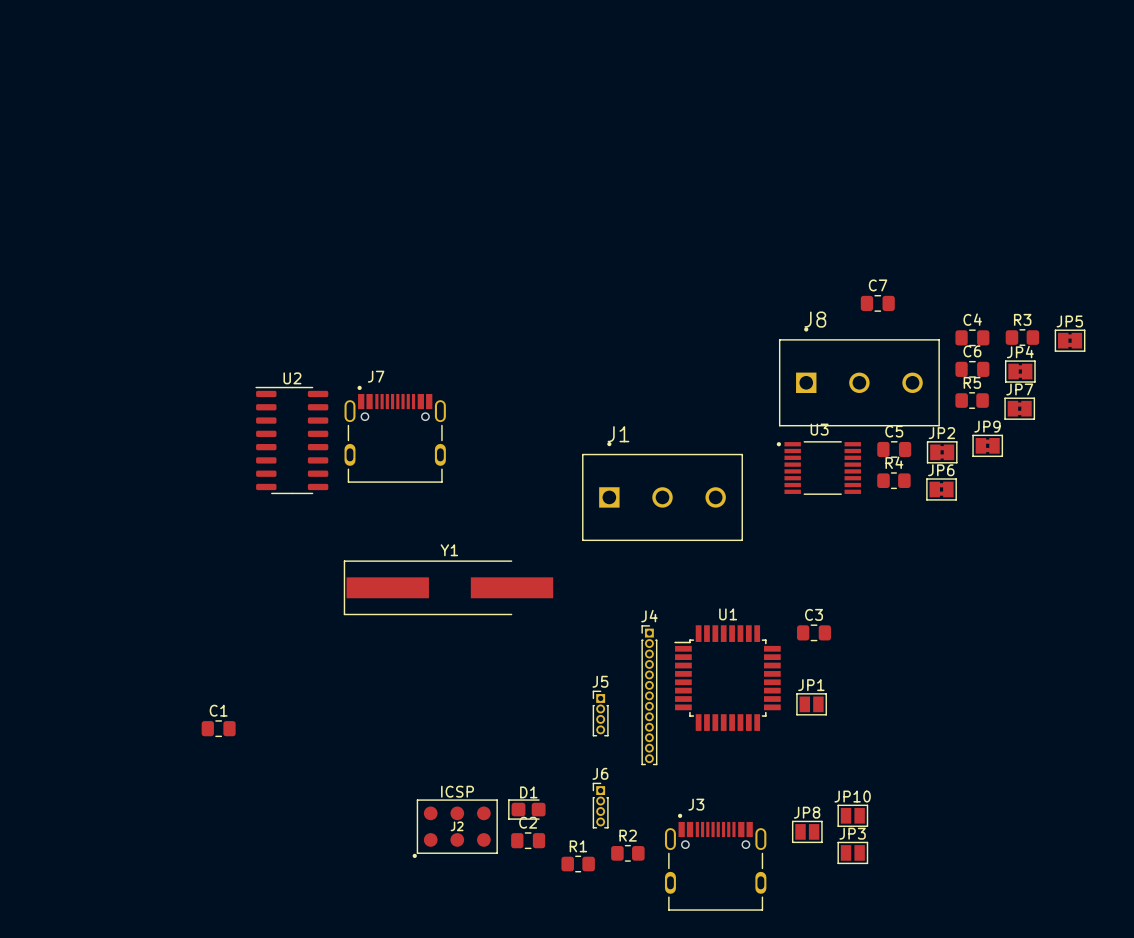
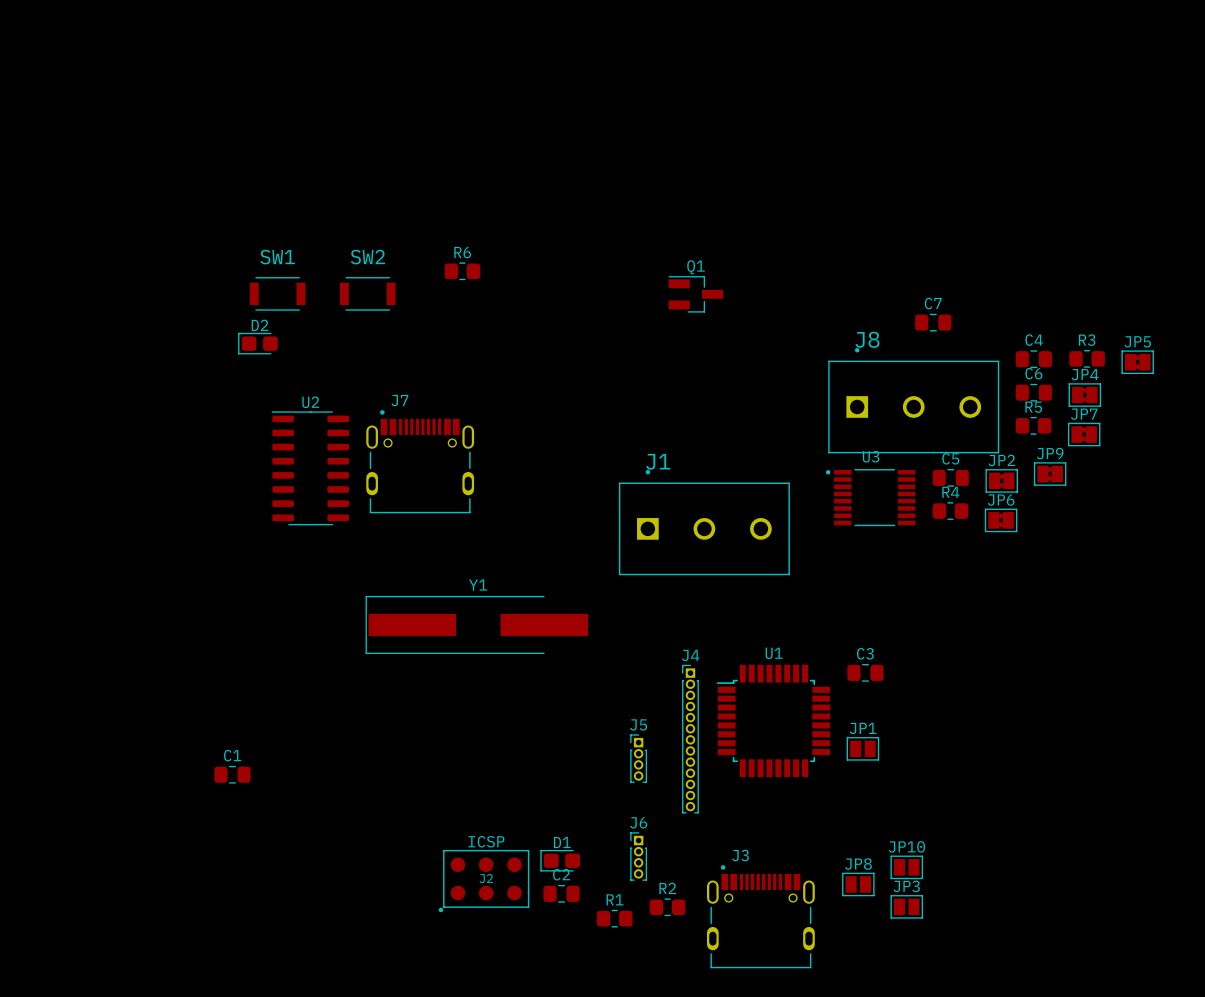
R6: none -> (462, 271)
SW1: none -> (277, 293)
SW2: none -> (367, 293)
Q1: none -> (695, 294)
D2: none -> (257, 343)

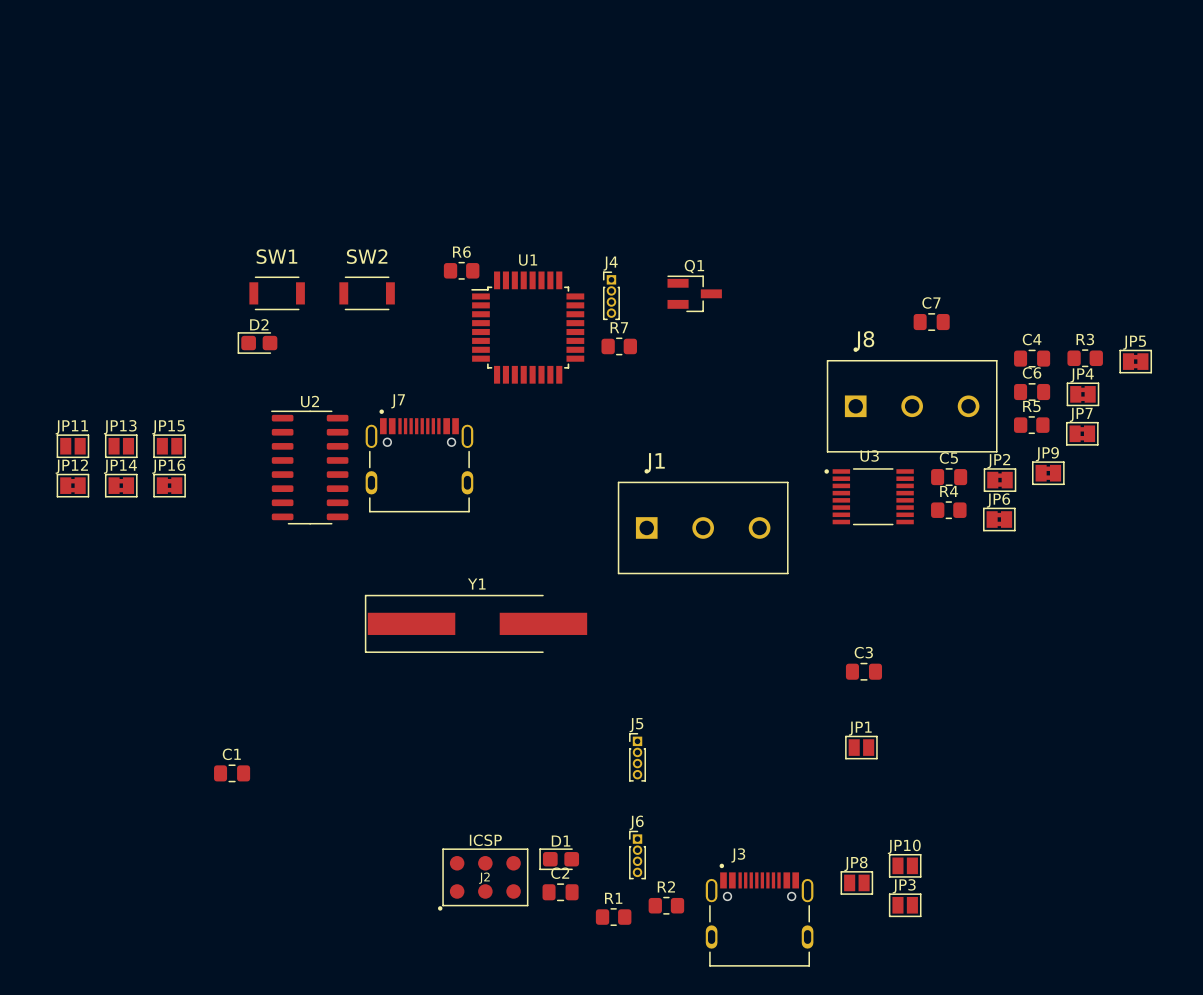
R7: none -> (619, 346)
JP11: none -> (72, 446)
JP13: none -> (121, 446)
JP15: none -> (169, 446)
JP12: none -> (72, 485)
JP14: none -> (121, 485)
JP16: none -> (169, 485)
J4 name position: J4 (690, 655) -> J4 (610, 263)
J4 footprint: [682, 664, 699, 814] -> [603, 271, 620, 321]
U1 position: (773, 720) -> (527, 327)

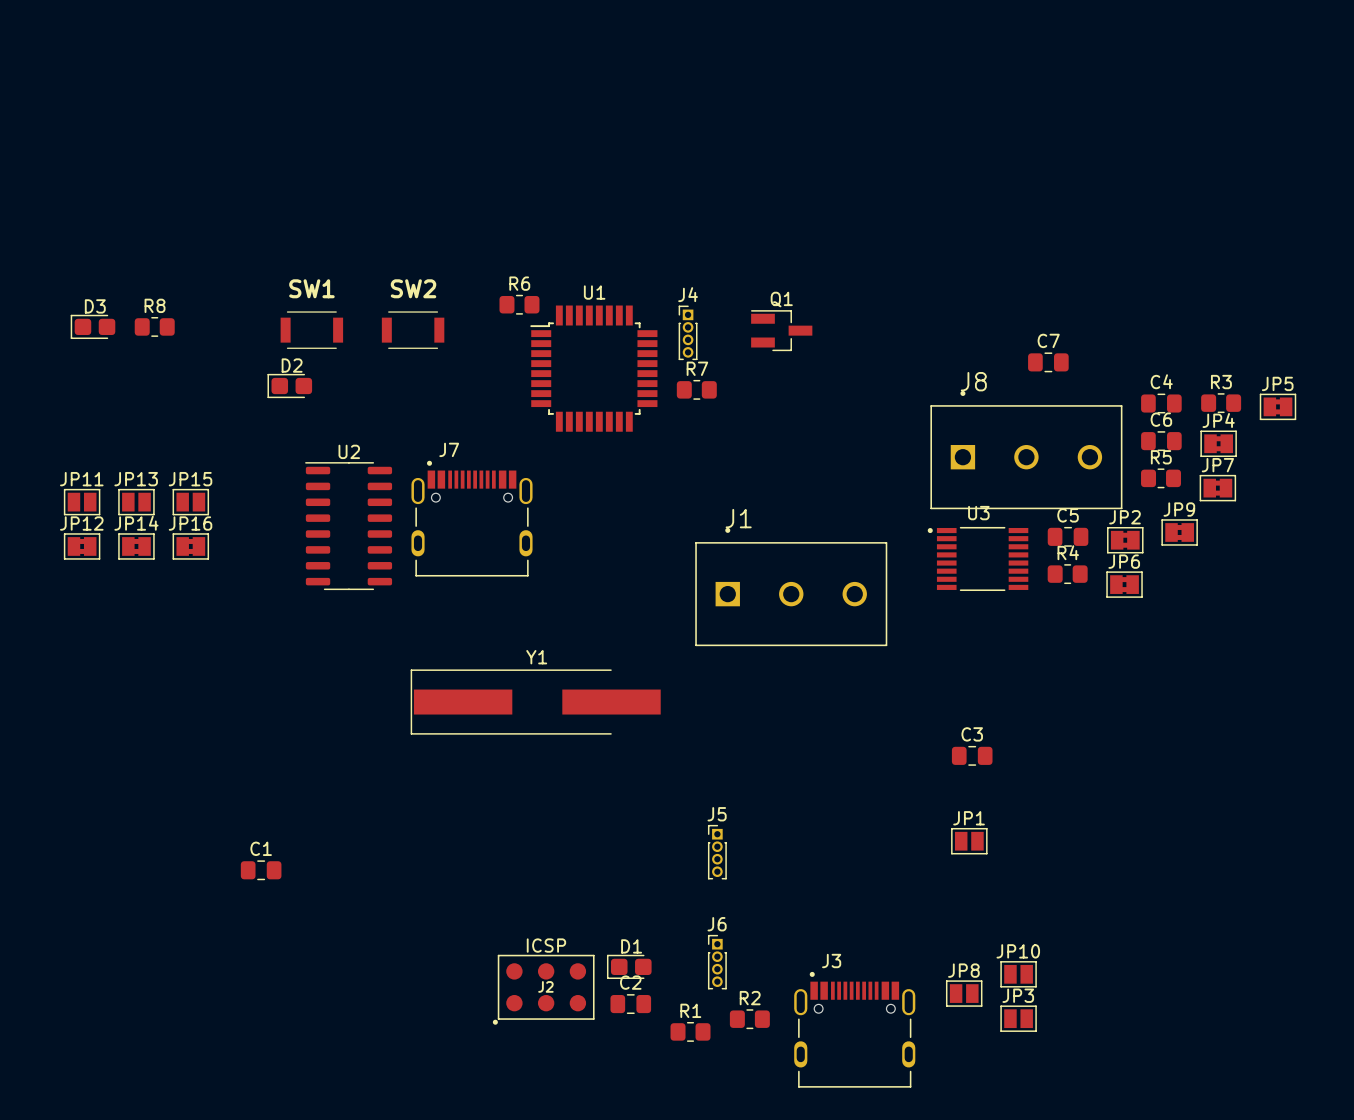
D3: none -> (92, 326)
R8: none -> (154, 326)

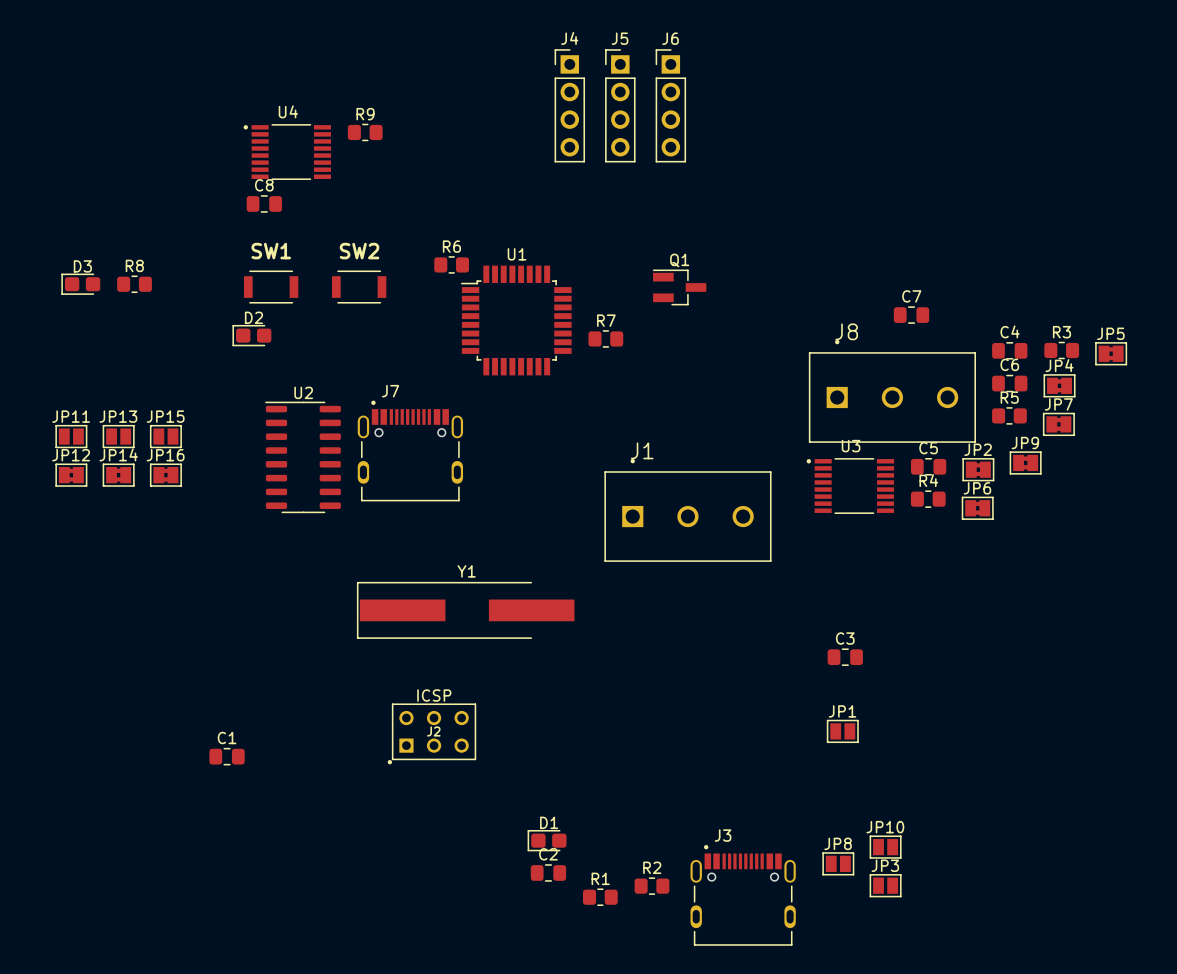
R9: none -> (365, 132)
U4: none -> (287, 152)
C8: none -> (264, 203)
J4 name position: J4 (688, 294) -> J4 (569, 38)
J4 footprint: [678, 305, 698, 361] -> [554, 49, 585, 163]
J5 name position: J5 (717, 814) -> J5 (620, 38)
J5 footprint: [707, 824, 727, 880] -> [605, 49, 636, 163]
J6 name position: J6 (717, 924) -> J6 (670, 38)
J6 footprint: [707, 934, 727, 990] -> [655, 49, 686, 163]
J2 footprint: [492, 954, 595, 1025] -> [387, 703, 477, 765]

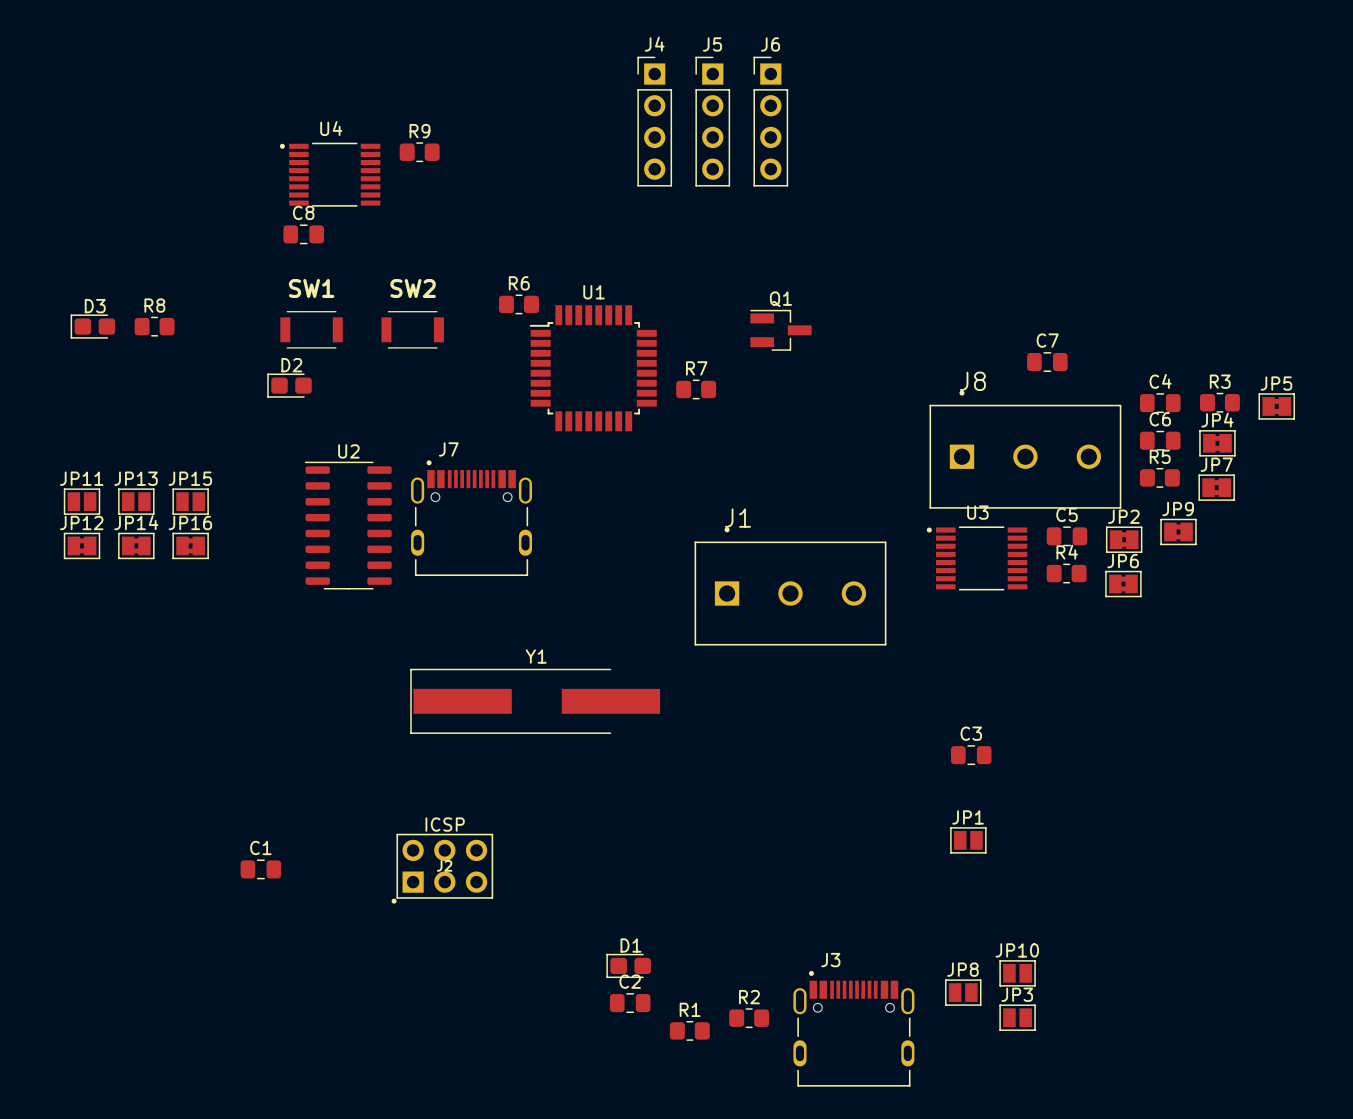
J2 footprint: [387, 703, 477, 765] -> [391, 833, 494, 904]

